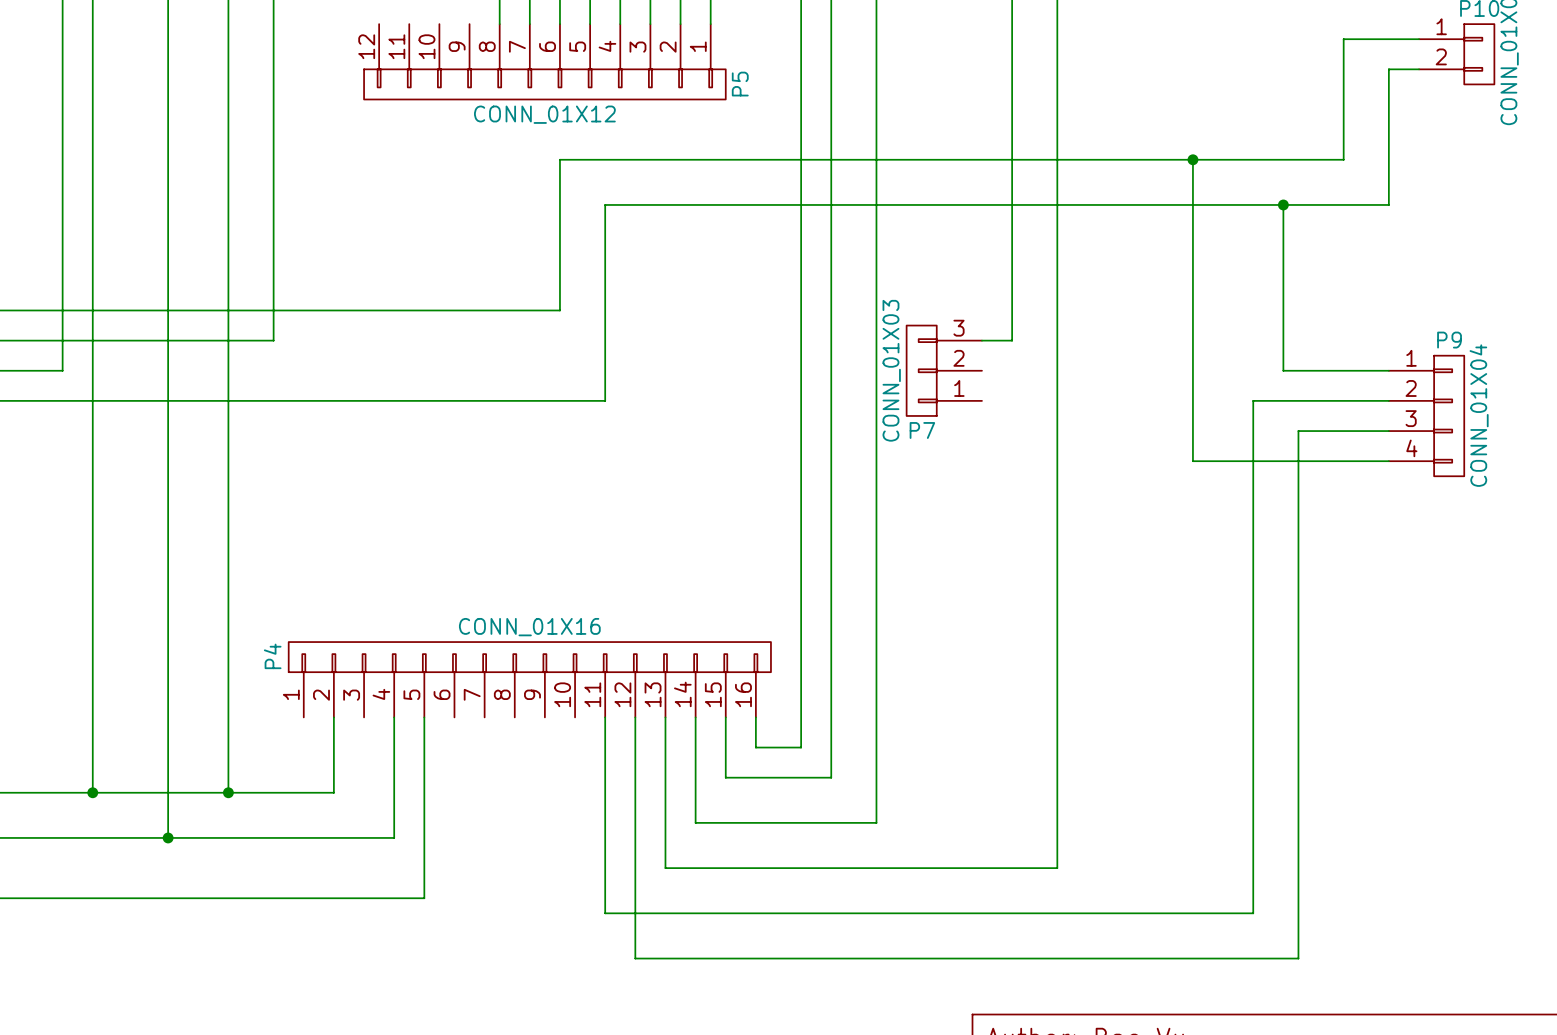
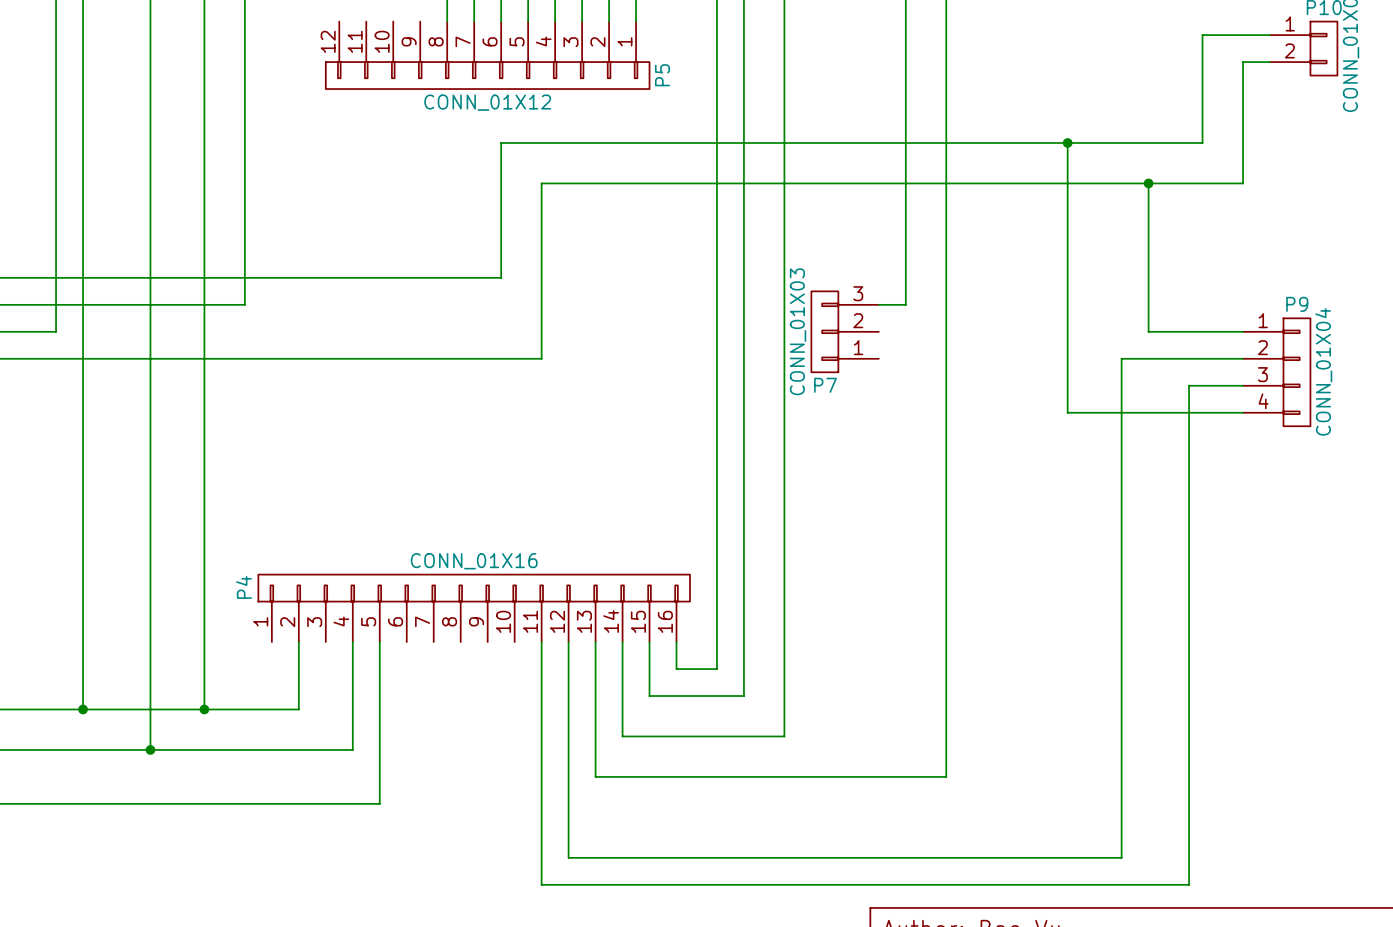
wire: (1328, 431) (1298, 431) (1298, 958) (1253, 958) -> (1121, 817) (1121, 857)
wire: (605, 913) (1253, 913) -> (541, 817) (541, 884) (1189, 884) (1189, 385)

